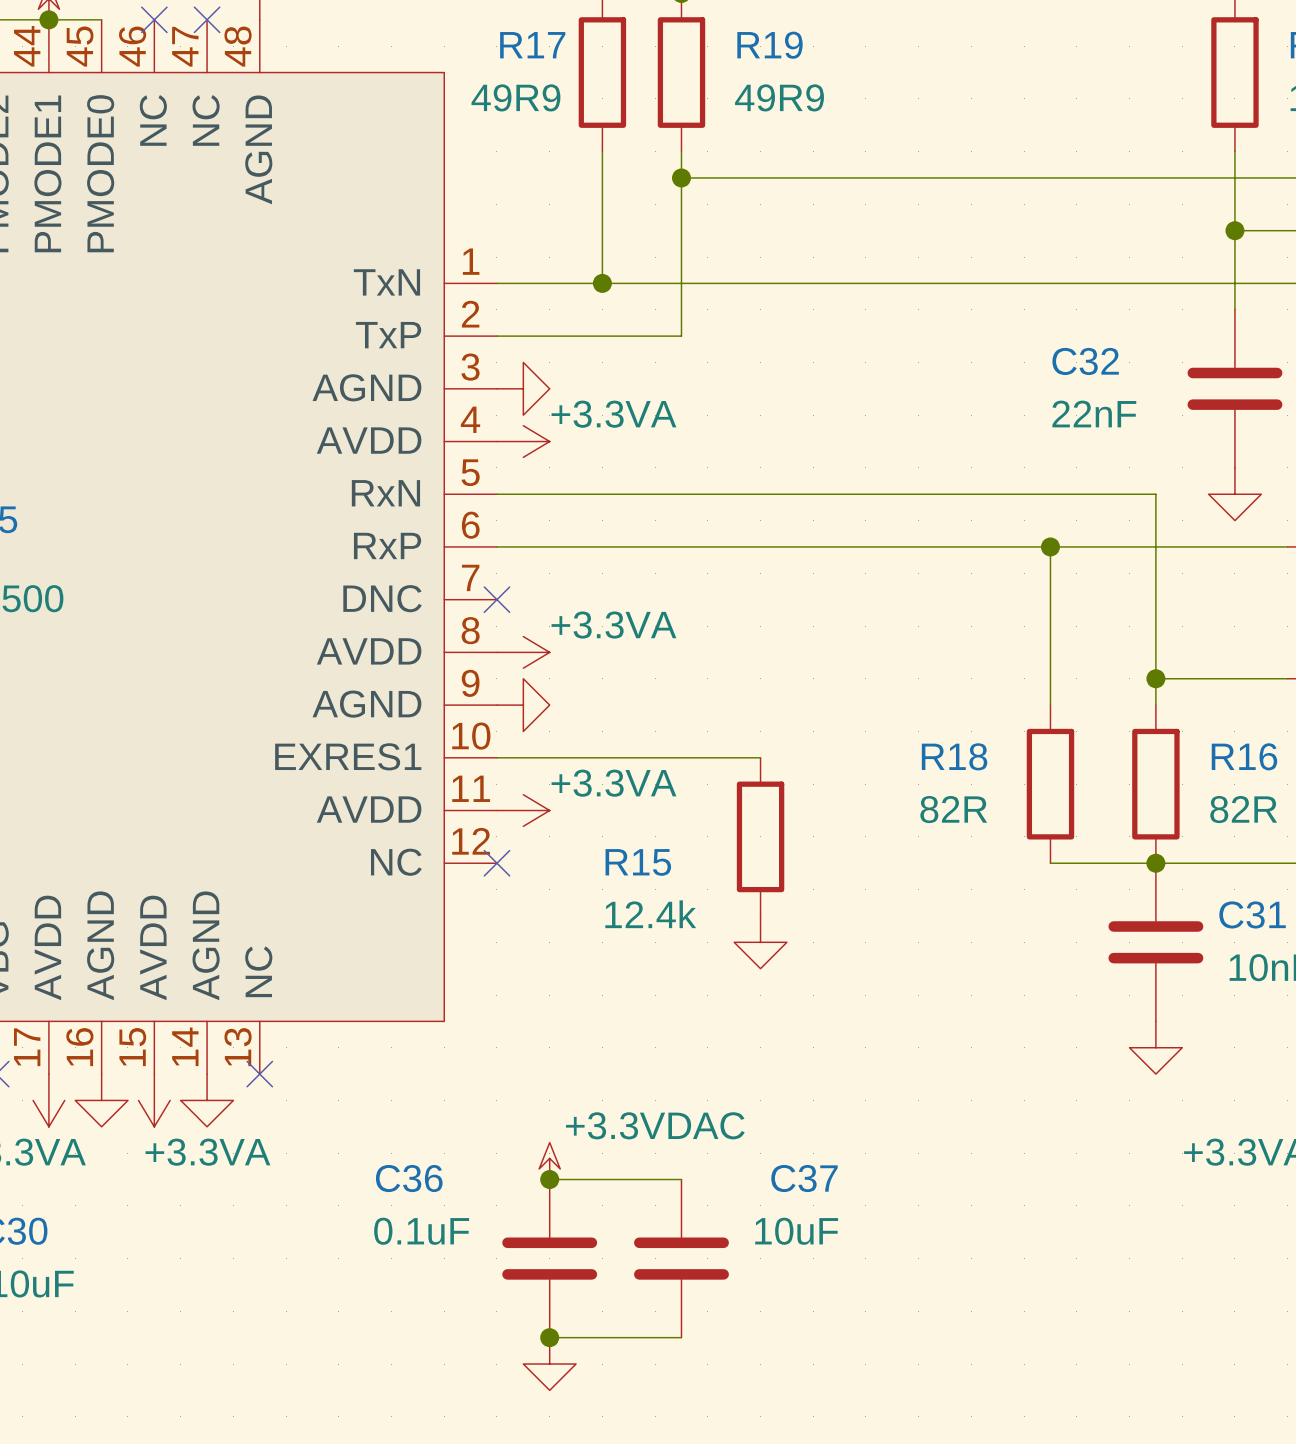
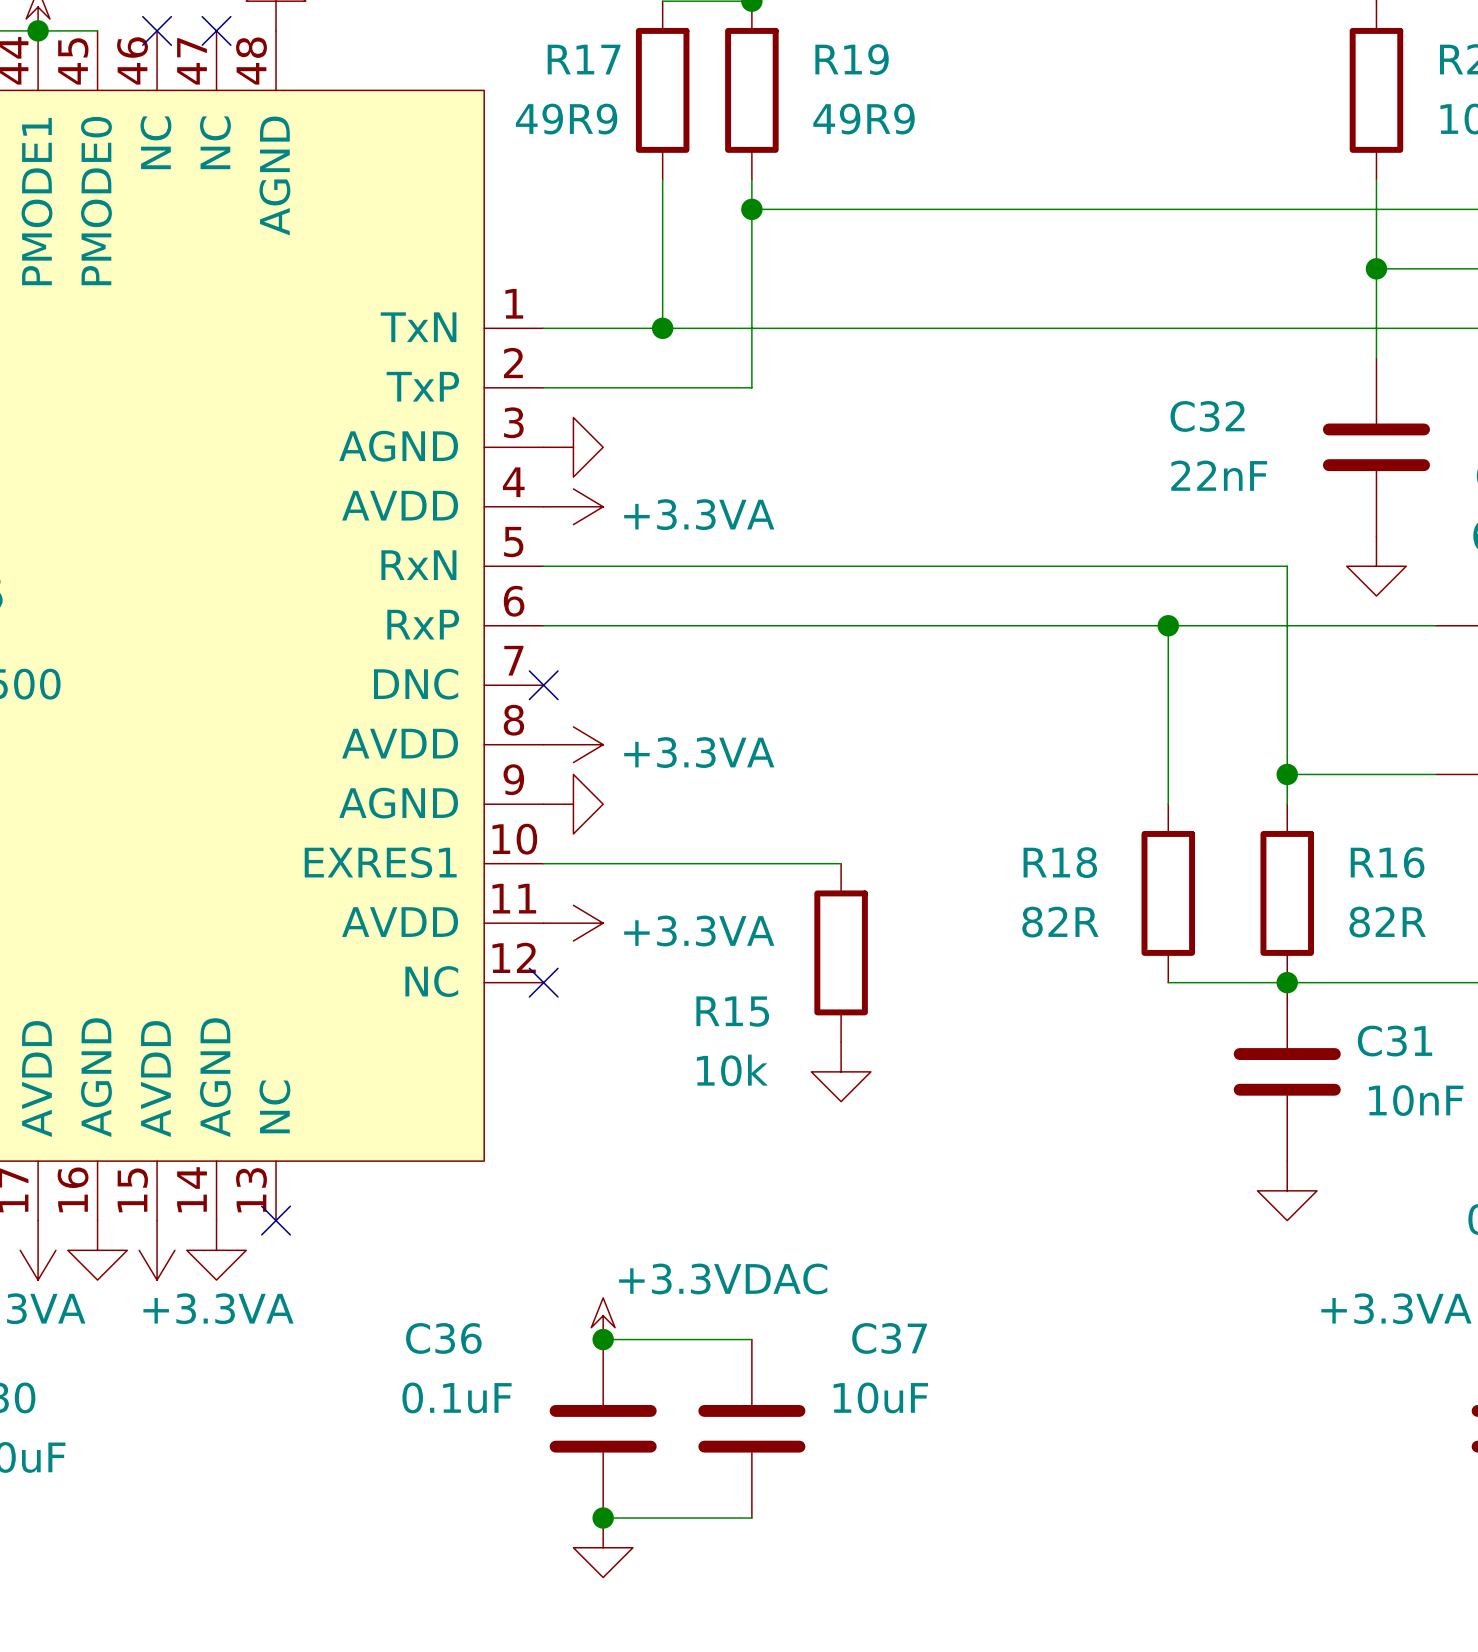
power symbol text position: +3.3VA (613, 414) -> +3.3VA (699, 514)
power symbol text position: +3.3VA (613, 625) -> +3.3VA (699, 752)
power symbol text position: +3.3VA (613, 783) -> +3.3VA (699, 931)
R15 name position: R15 (638, 862) -> R15 (732, 1011)
R15 value: 12.4k (650, 914) -> 10k (732, 1070)

